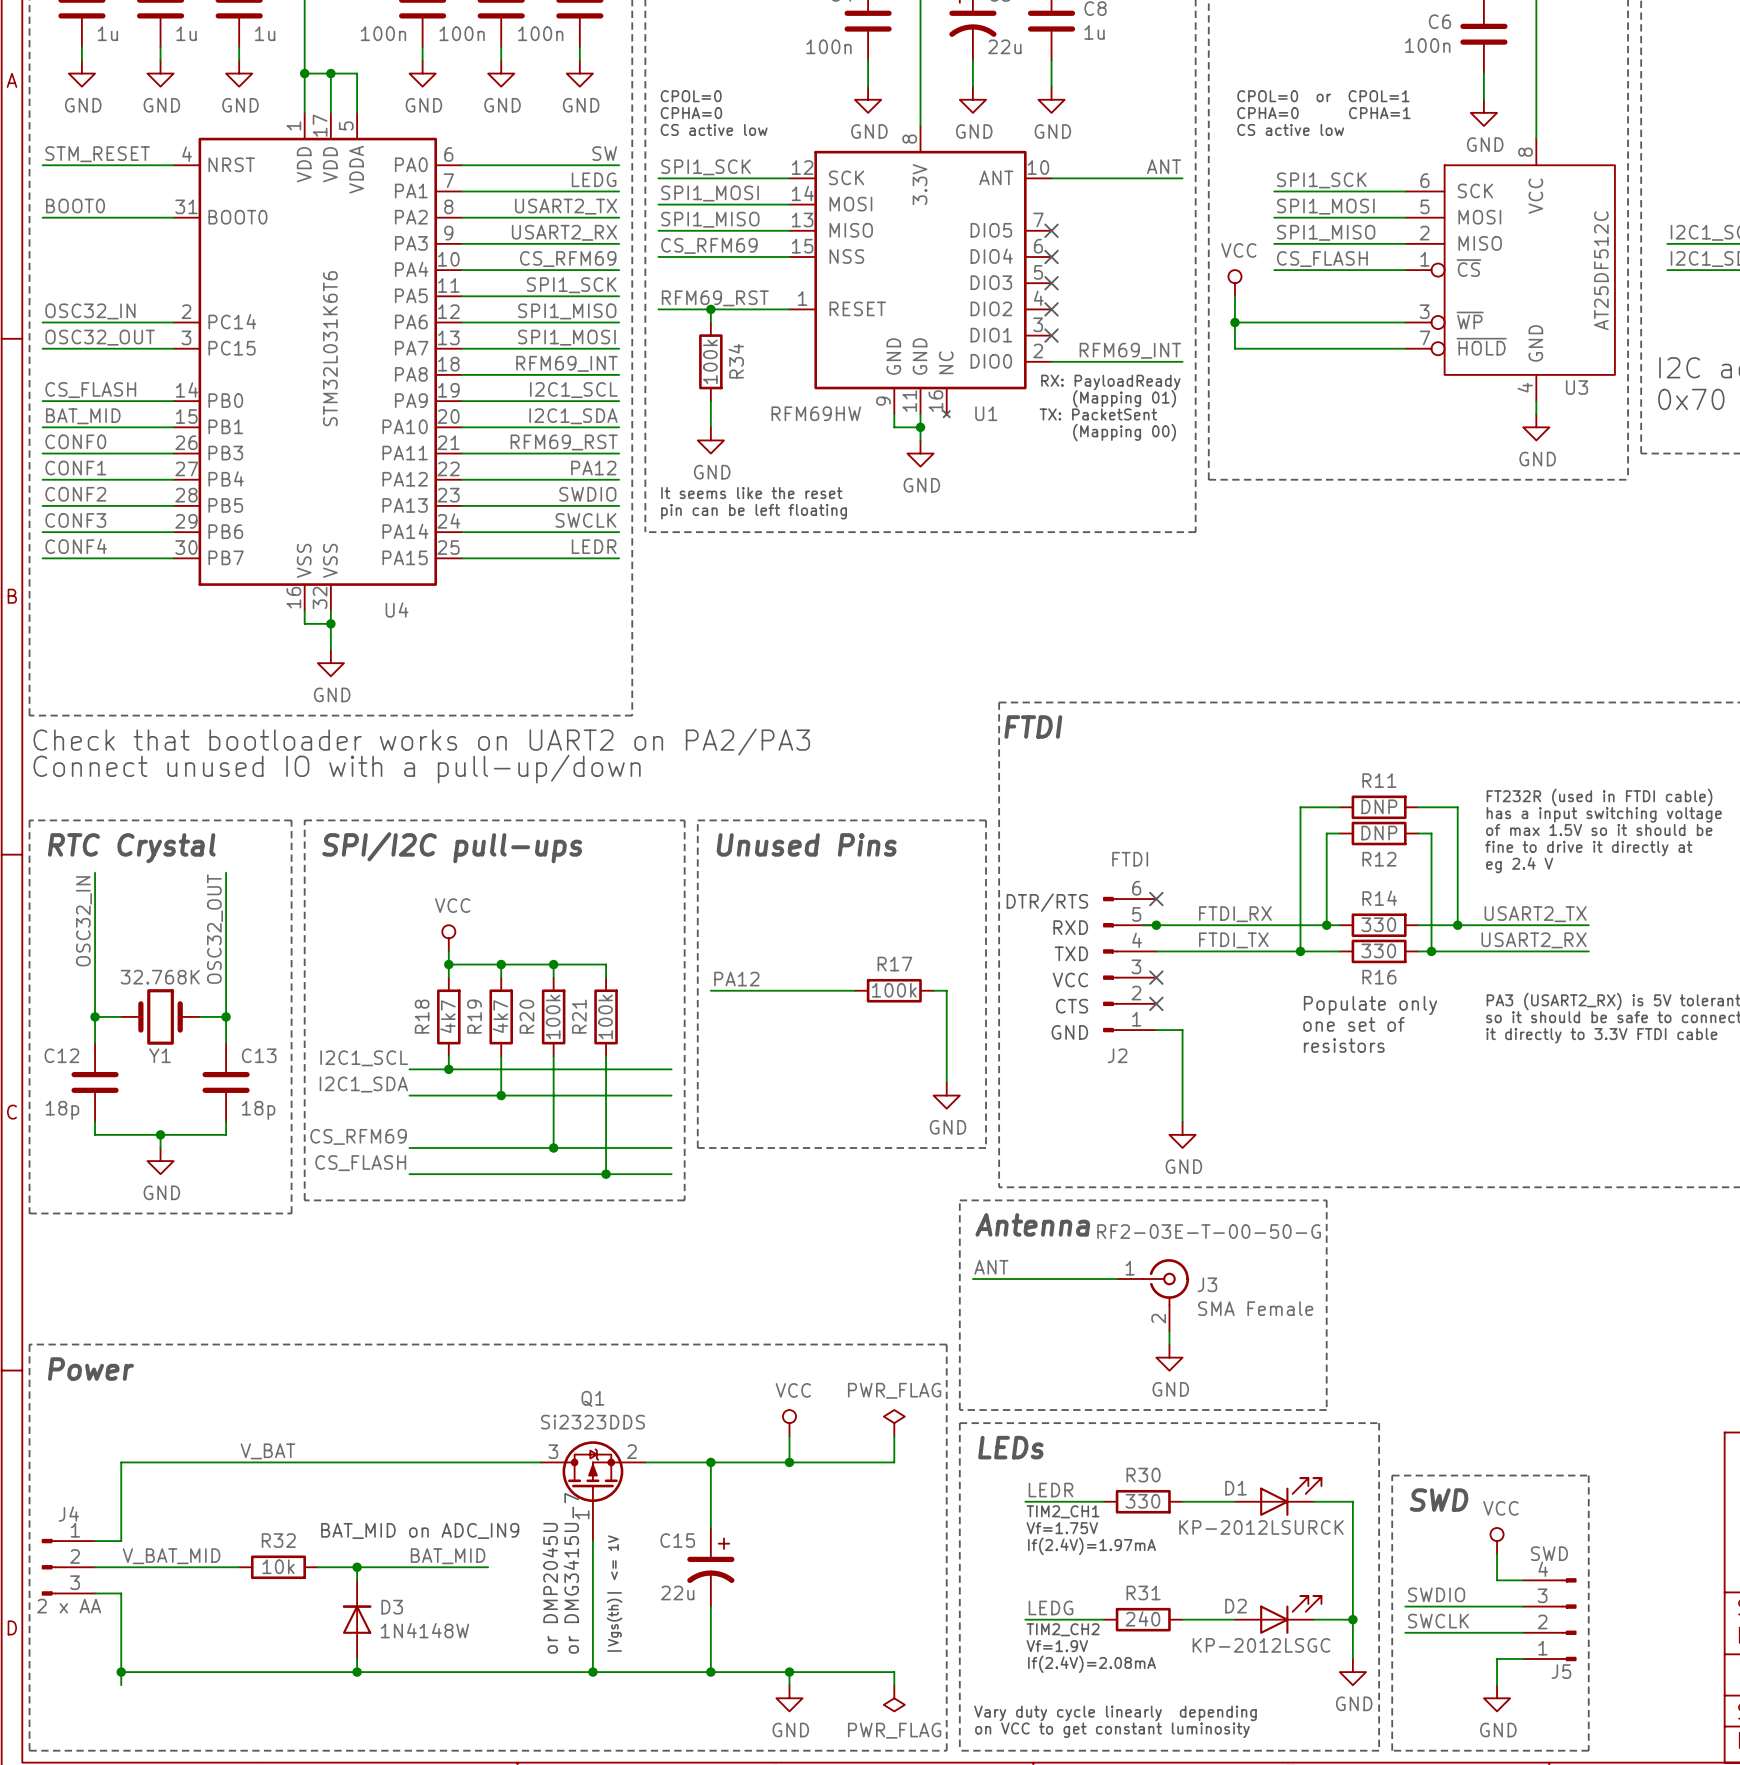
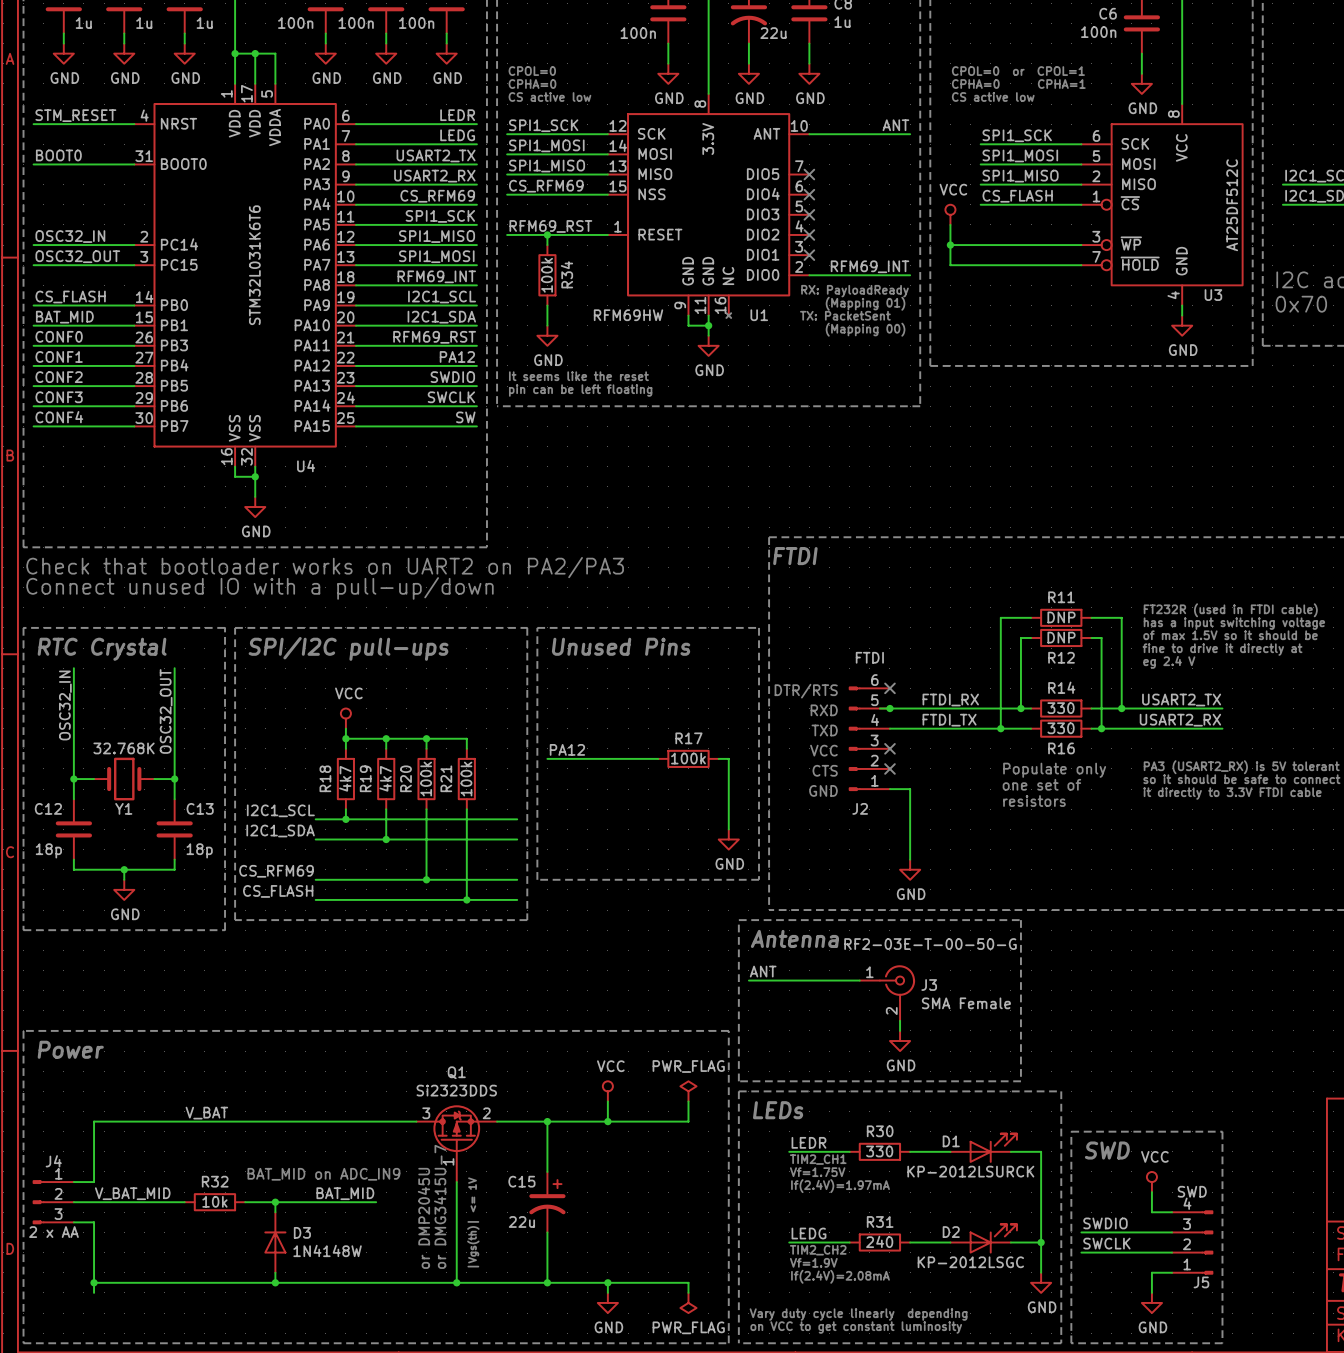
label: SW (604, 153) -> LEDR (457, 115)
label: LEDR (594, 546) -> SW (465, 417)

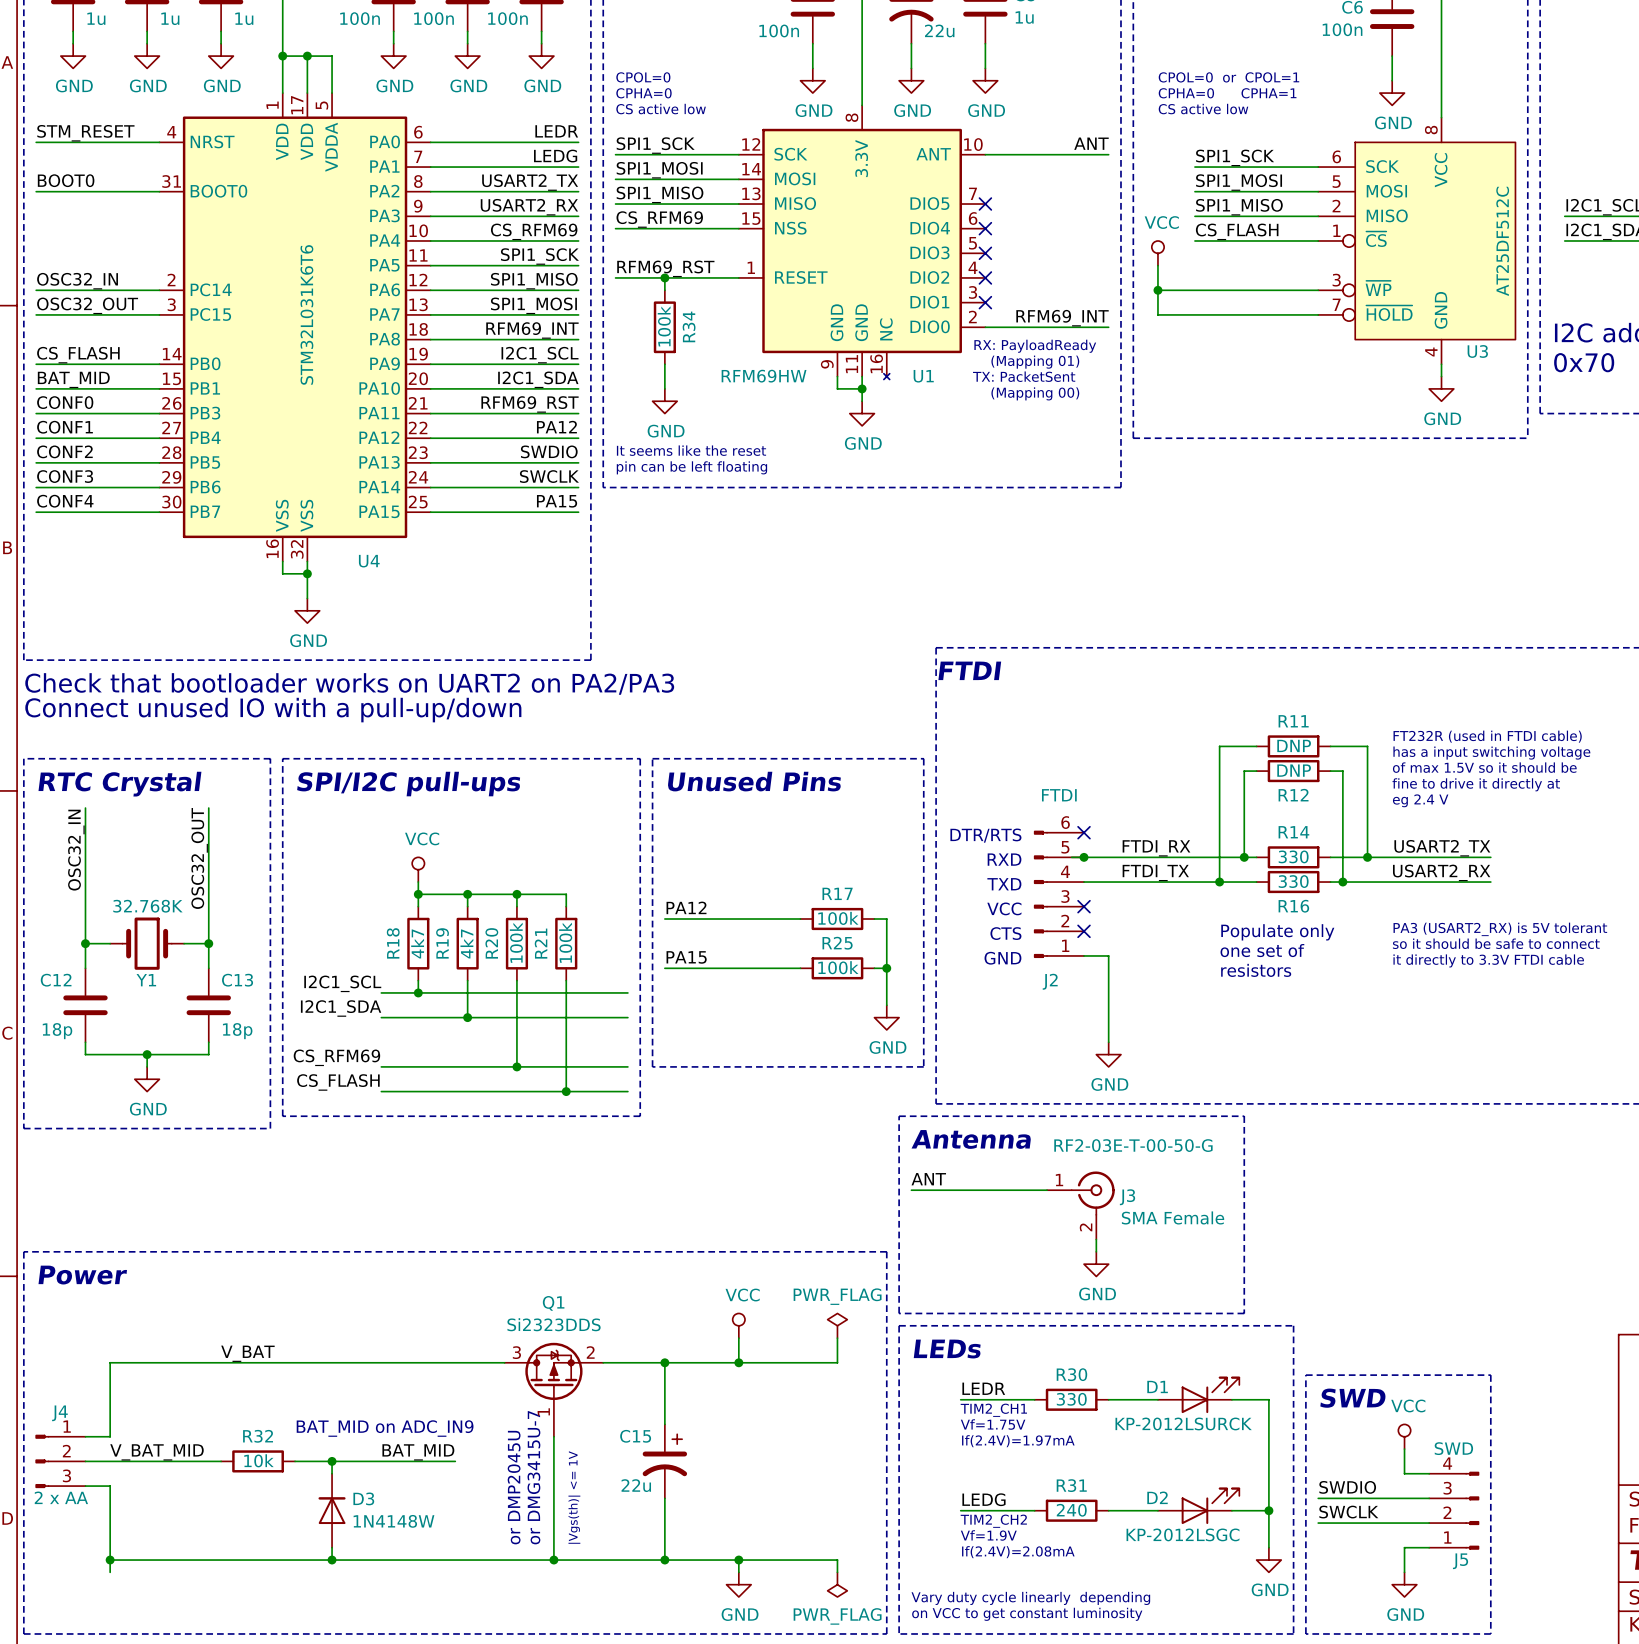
label: SW (465, 417) -> PA15 (557, 501)
label: none -> PA15 (686, 957)
wire: none -> (664, 968) (800, 968)
R25: none -> 100k (837, 968)
wire: none -> (874, 968) (886, 968)
junction: none -> (886, 968)

